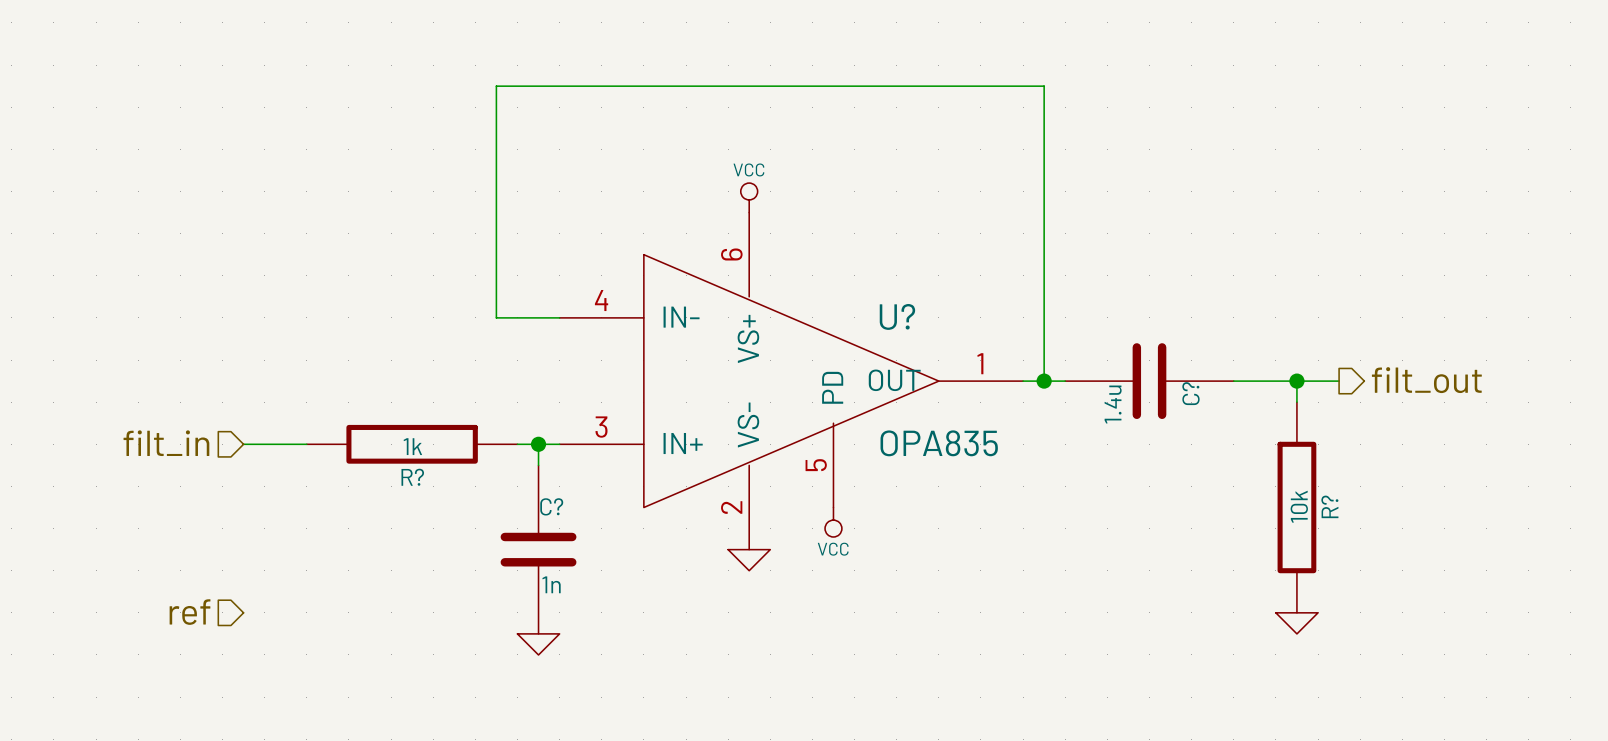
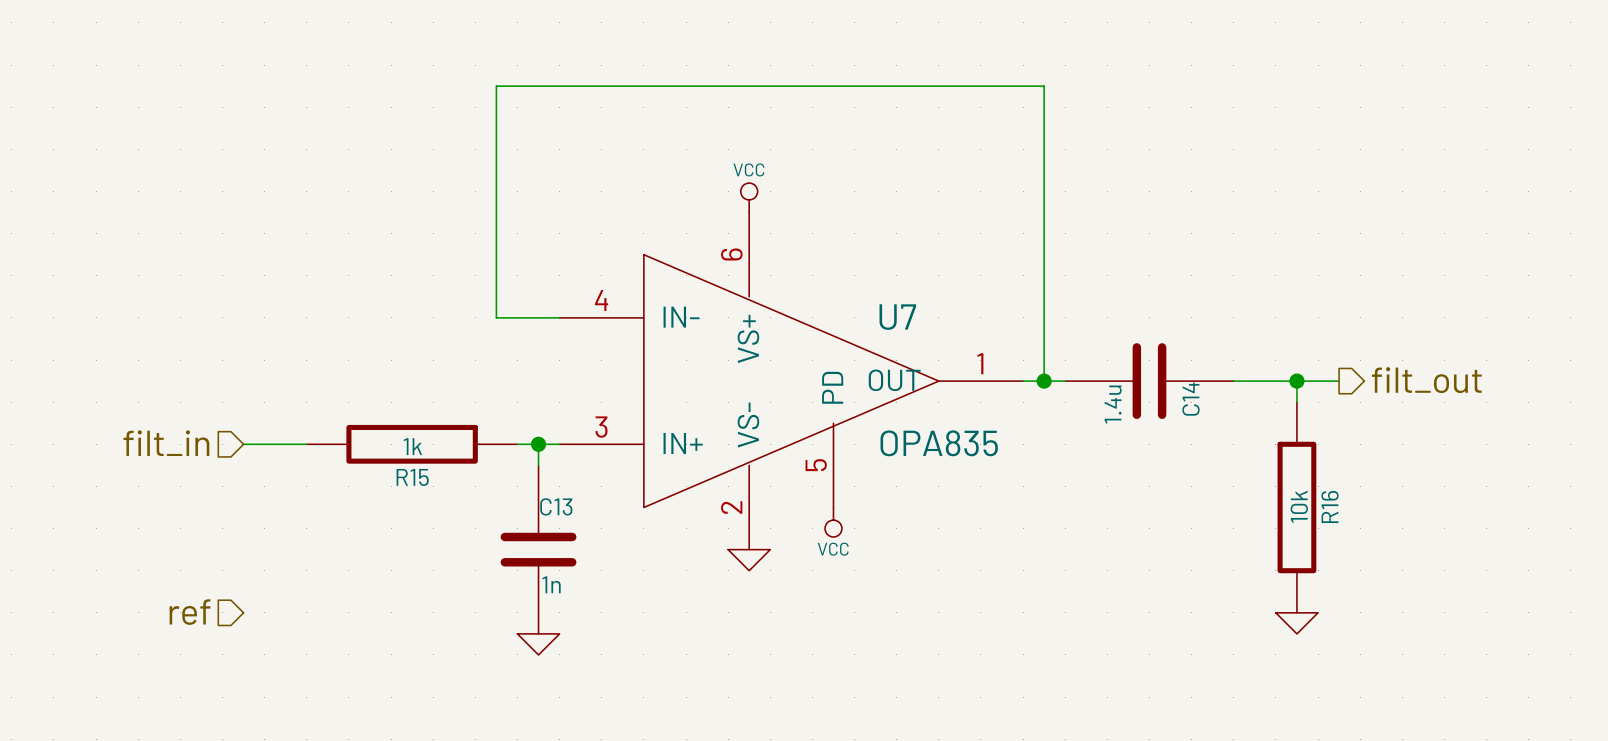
U? name: U? (897, 316) -> U7 (897, 317)
C? name: C? (1190, 393) -> C14 (1190, 399)
R? name: R? (412, 477) -> R15 (412, 477)
C? name: C? (551, 506) -> C13 (556, 506)
R? name: R? (1329, 506) -> R16 (1330, 506)

